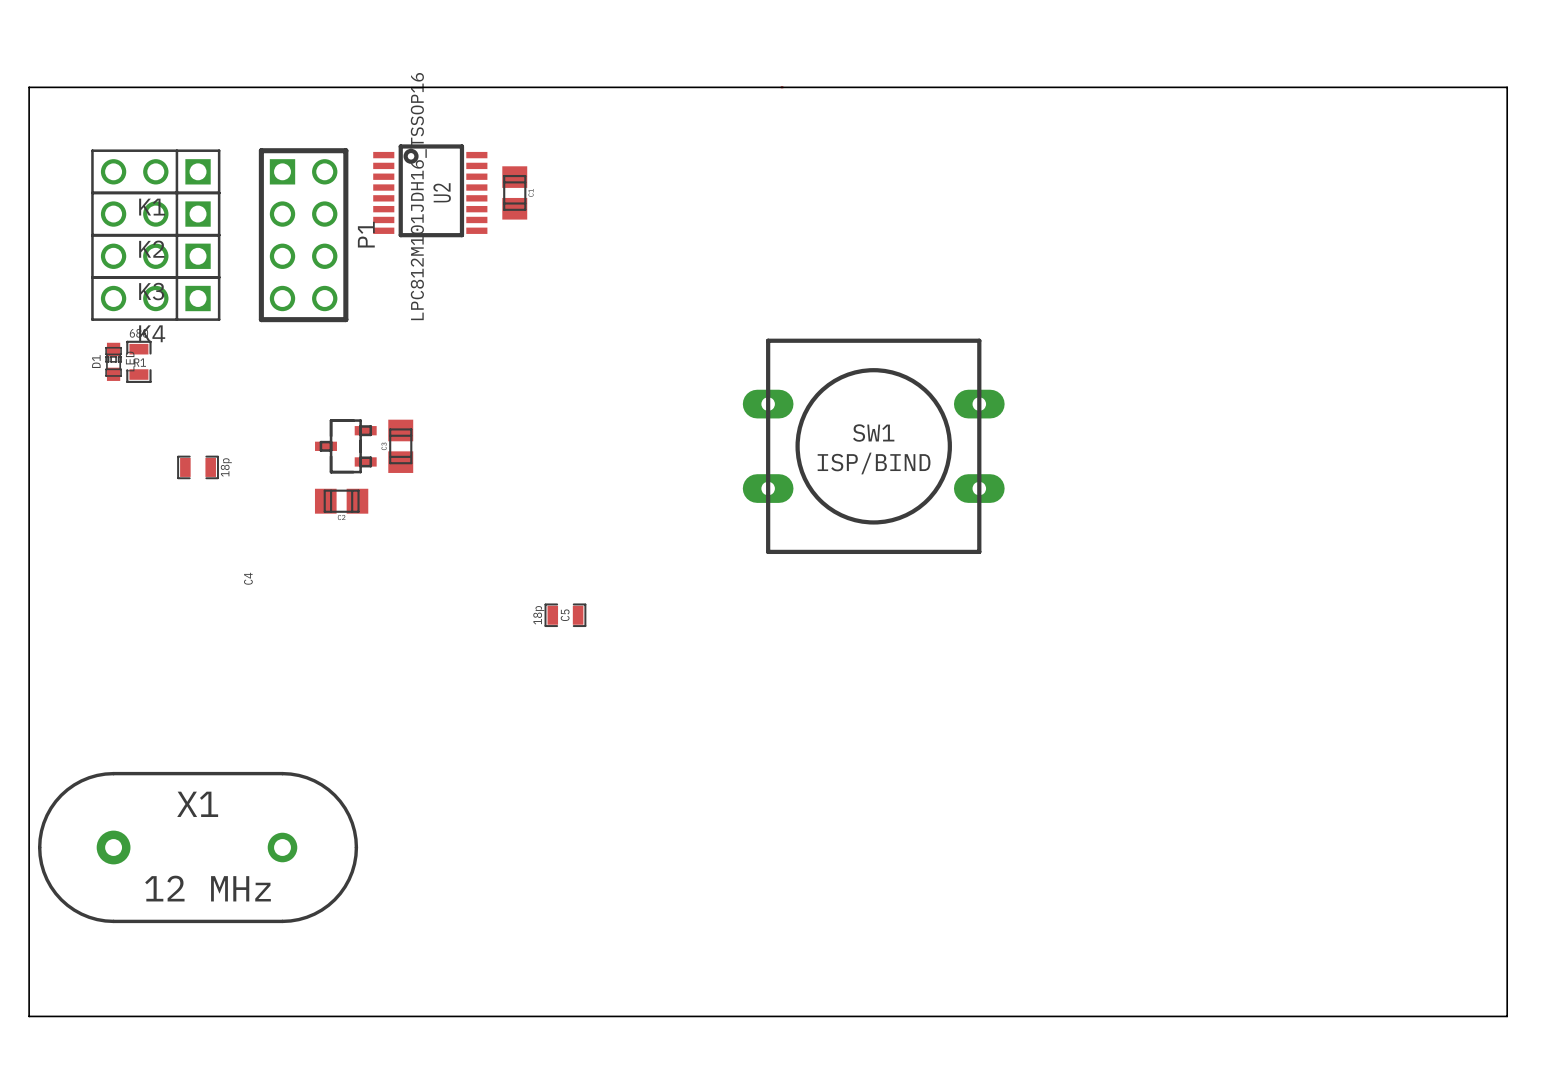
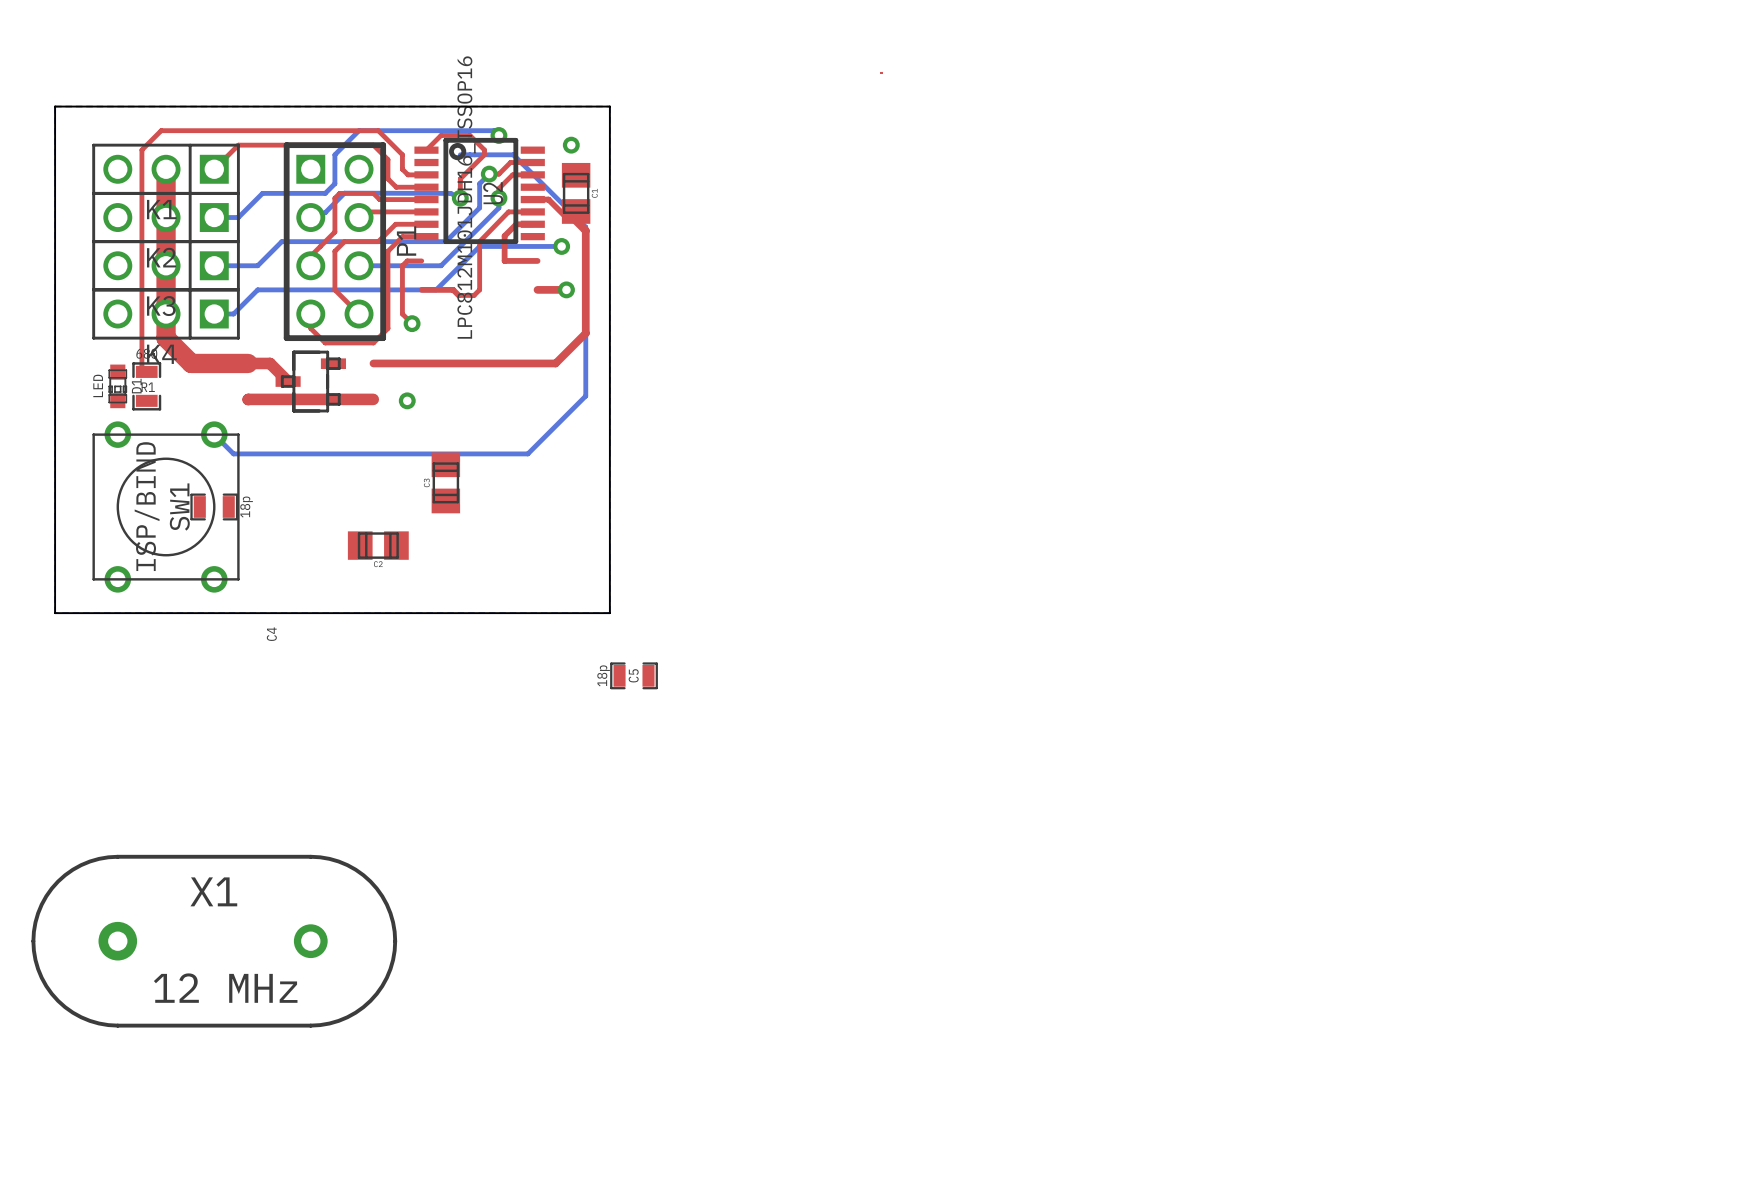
board edge: (29, 87) (29, 1016) (1507, 1016) (1507, 87) (29, 87) -> none
board edge: none -> (55, 106) (55, 613) (609, 613) (609, 106) (55, 106)
bottom track: none -> (498, 135) (494, 130) (359, 130) (334, 154) (334, 183) (325, 193) (262, 193) (238, 217) (214, 217)
via: none -> (498, 135)
via: none -> (571, 145)
top track: none -> (426, 150) (441, 135) (469, 135) (484, 149) (484, 154) (460, 178) (460, 198)
bottom track: none -> (460, 154) (513, 154) (585, 227) (585, 396) (527, 453) (233, 453) (214, 434)
top track: none -> (532, 162) (510, 162) (498, 174) (489, 174)
top track: none -> (166, 169) (166, 338) (191, 363) (270, 363) (288, 381)
top track: none -> (214, 169) (238, 145) (373, 145) (387, 159) (387, 178) (396, 187) (426, 187)
top track: none -> (426, 174) (408, 174) (402, 169) (402, 154) (378, 130) (161, 130) (141, 149) (141, 367) (146, 371)
bottom track: none -> (489, 174) (479, 183) (479, 207) (445, 241) (281, 241) (257, 265) (214, 265)
via: none -> (489, 174)
top track: none -> (532, 174) (512, 174) (498, 188) (498, 198)
bottom track: none -> (460, 198) (450, 193) (344, 193) (325, 212) (310, 217)
via: none -> (460, 198)
bottom track: none -> (498, 198) (498, 207) (441, 265) (359, 265)
via: none -> (498, 198)
top track: none -> (426, 199) (379, 199) (373, 193) (339, 193) (334, 198) (334, 231) (310, 256) (310, 265)
top track: none -> (532, 199) (548, 199) (565, 216) (571, 216) (585, 230) (585, 333) (555, 363) (373, 363)
top track: none -> (426, 211) (364, 211) (359, 217)
top track: none -> (532, 211) (508, 211) (479, 241) (479, 289) (474, 295) (458, 295) (453, 289) (421, 289)
top track: none -> (426, 224) (395, 224) (378, 241) (344, 241) (334, 251) (334, 289) (359, 314)
top track: none -> (532, 224) (516, 224) (504, 235) (504, 260) (537, 260)
top track: none -> (426, 236) (402, 236) (387, 251) (387, 328) (373, 342) (325, 342) (310, 328) (310, 314)
bottom track: none -> (561, 246) (479, 246) (436, 289) (257, 289) (233, 314) (214, 314)
via: none -> (561, 246)
top track: none -> (421, 260) (407, 260) (402, 265) (402, 314) (412, 323)
top track: none -> (537, 289) (566, 289)
via: none -> (566, 289)
via: none -> (412, 323)
SW1 footprint: [742, 338, 1005, 555] -> [92, 421, 240, 593]
D1 rotation: 0° (113, 361) -> 180° (117, 386)
top track: none -> (248, 399) (373, 399)
via: none -> (407, 400)
part position: (345, 446) -> (310, 381)

